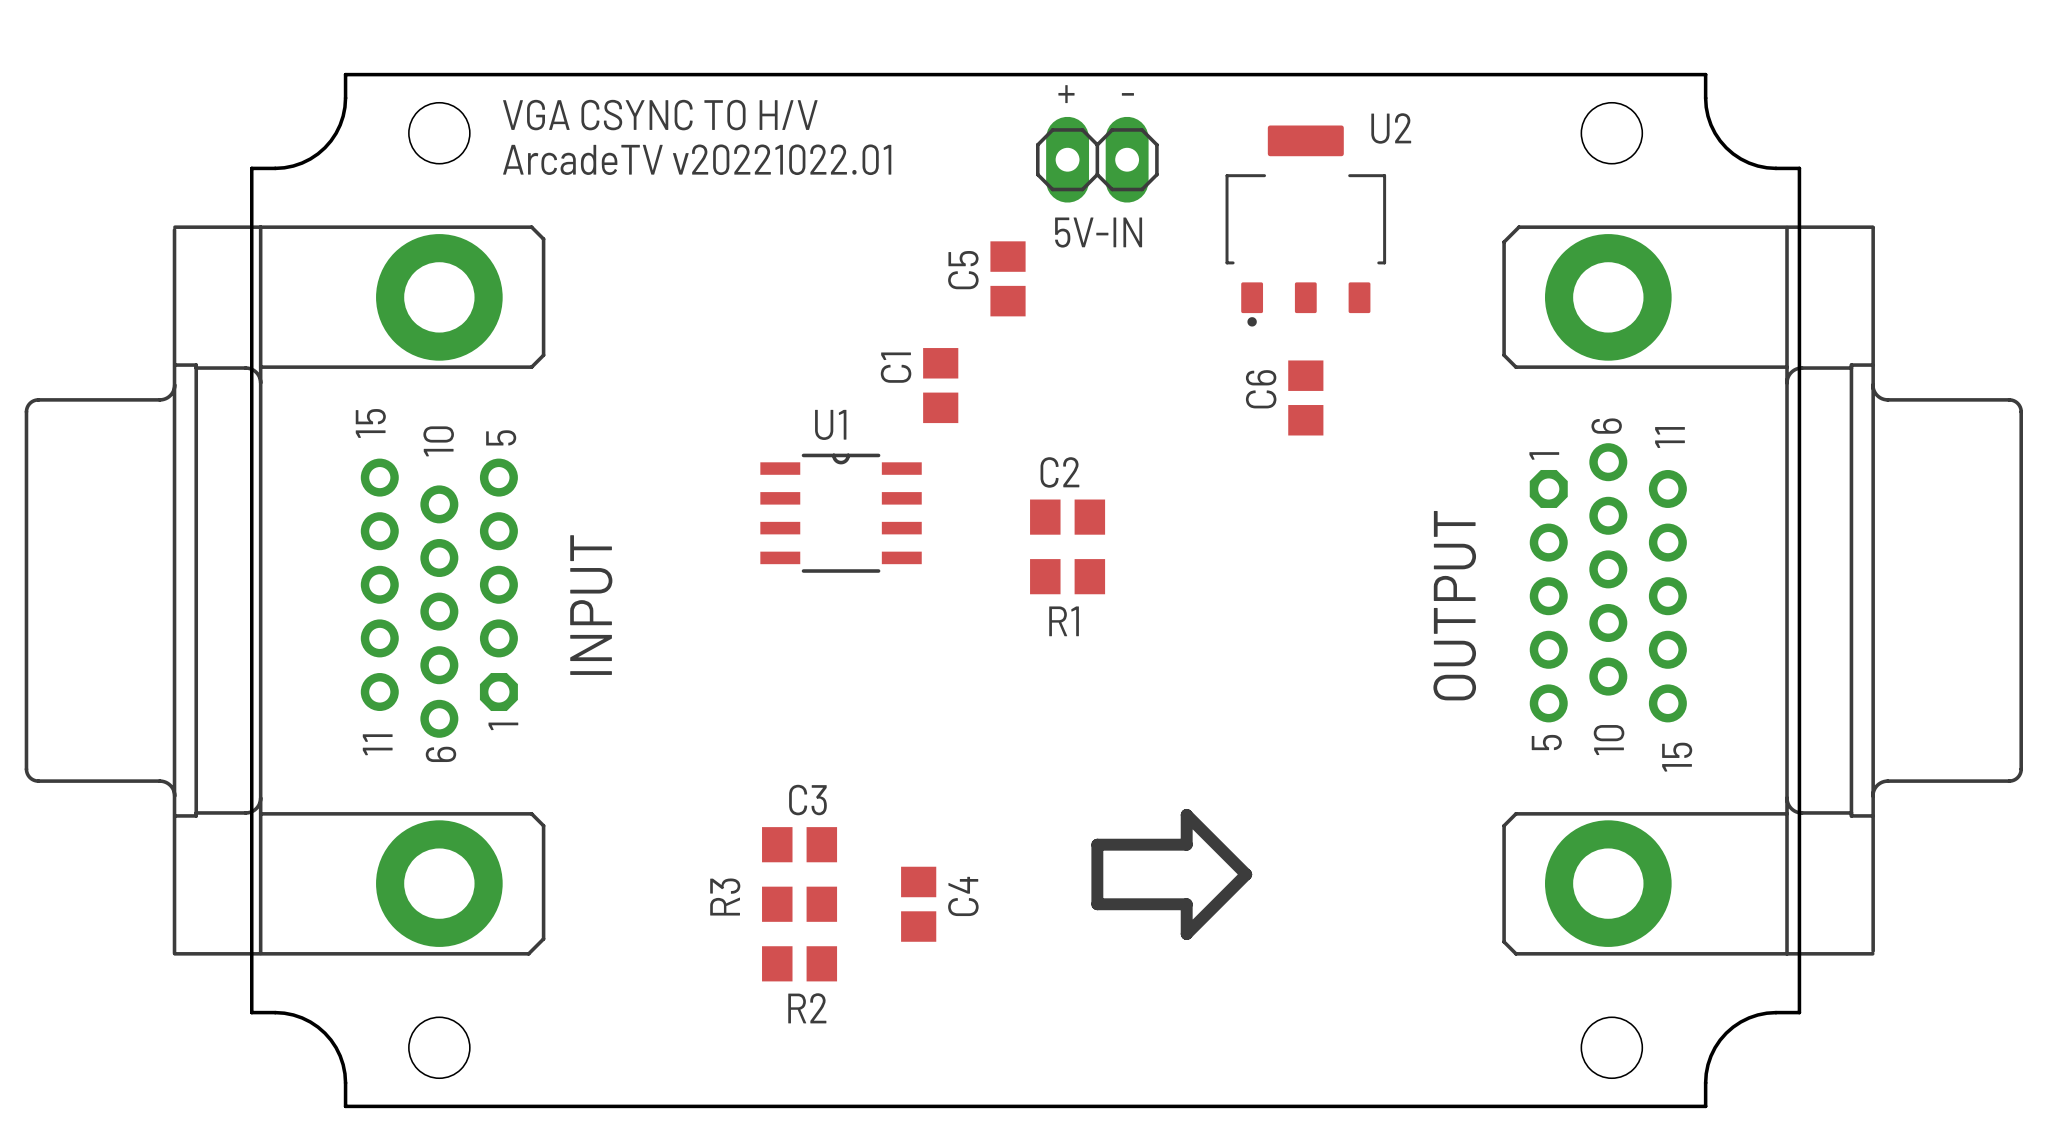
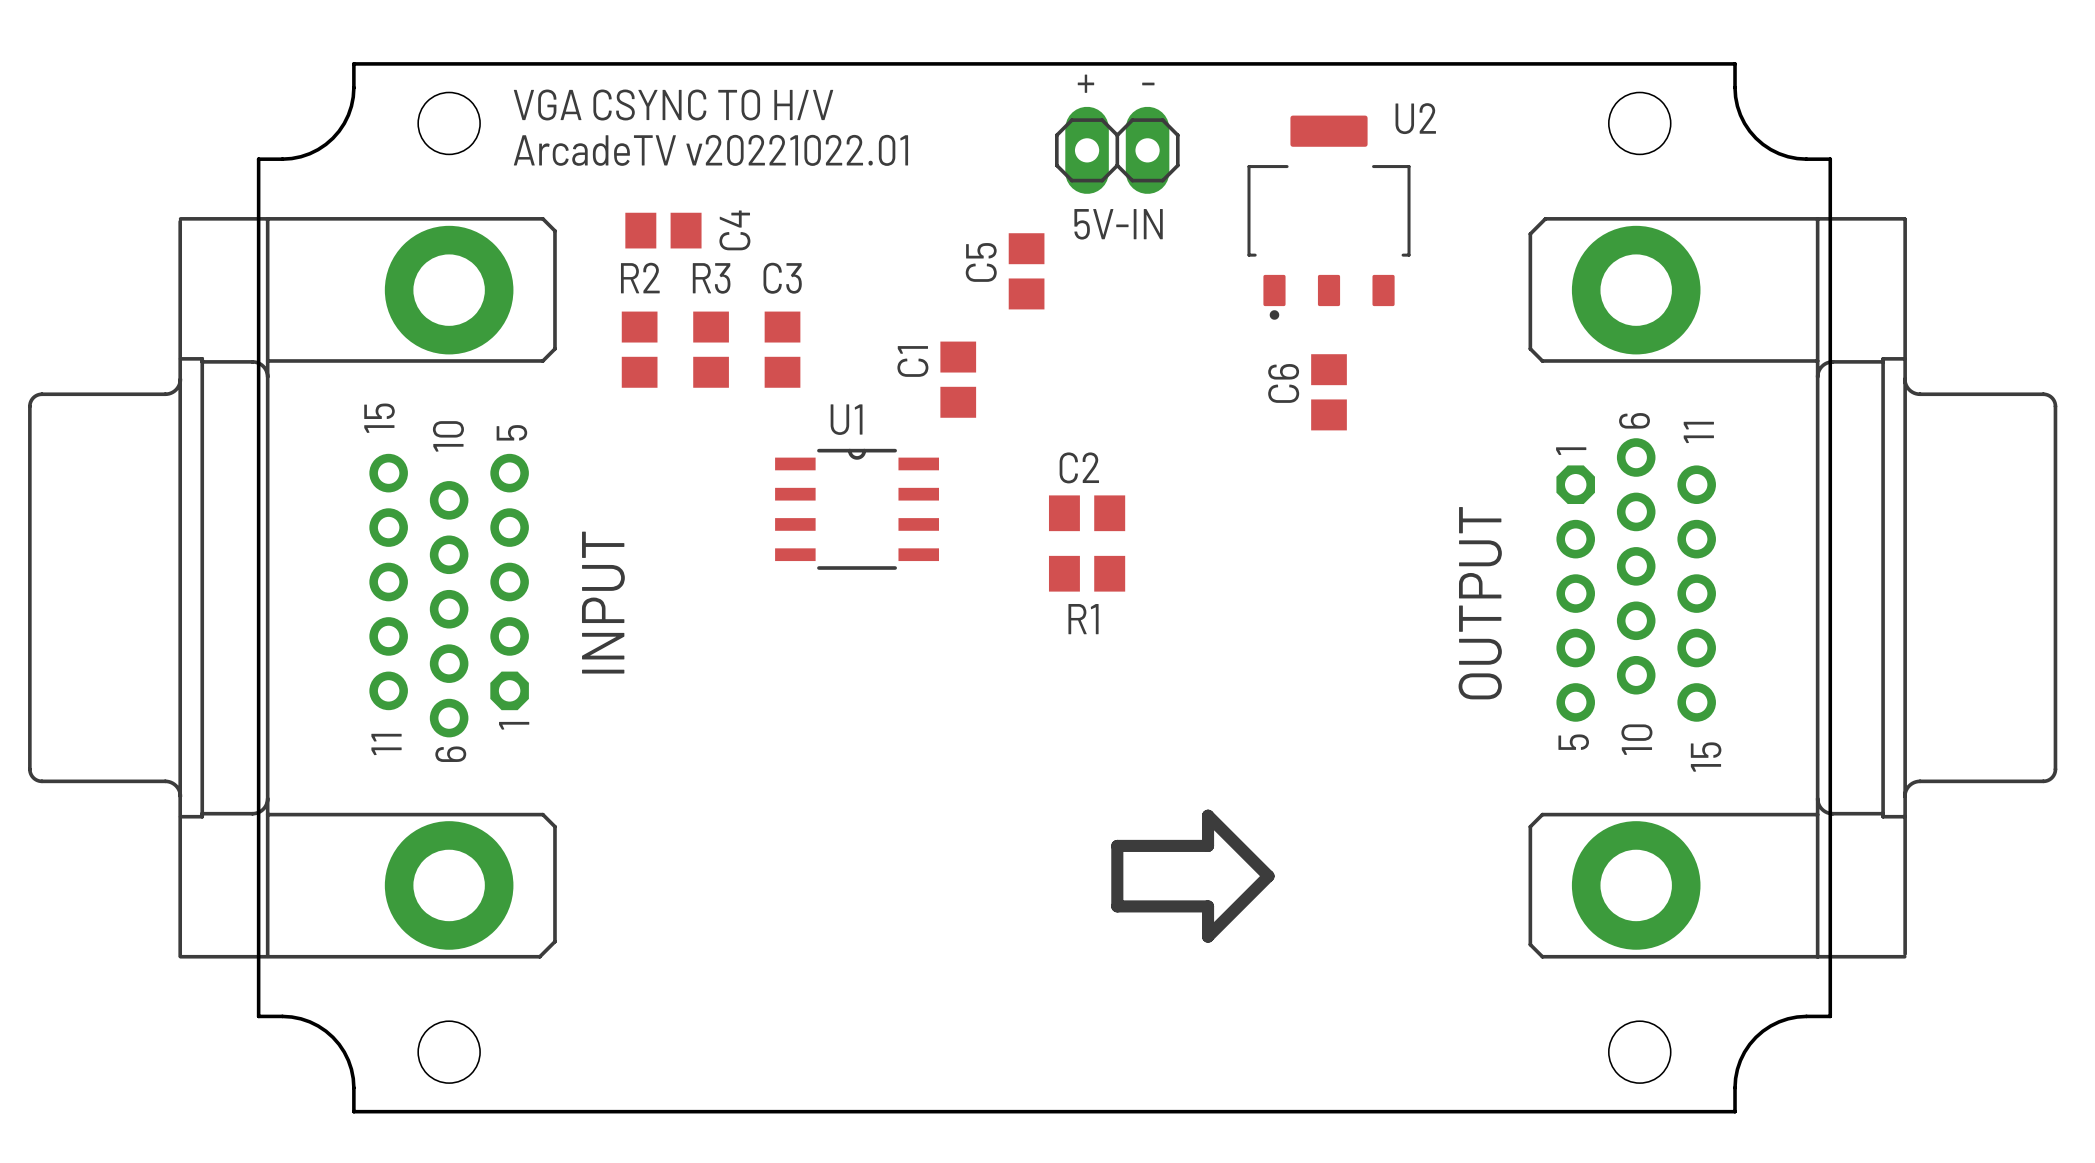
C3 rotation: 0° (799, 844) -> 90° clockwise (782, 349)
C3 position: (799, 844) -> (782, 349)
R3 rotation: 0° (799, 904) -> 90° clockwise (711, 349)
R3 position: (799, 904) -> (711, 349)
C4 rotation: 0° (918, 904) -> 90° clockwise (663, 230)
C4 position: (918, 904) -> (663, 230)
R2 rotation: 0° (799, 963) -> 90° clockwise (639, 349)
R2 position: (799, 963) -> (639, 349)
R2 name position: R2 (807, 1008) -> R2 (640, 278)

